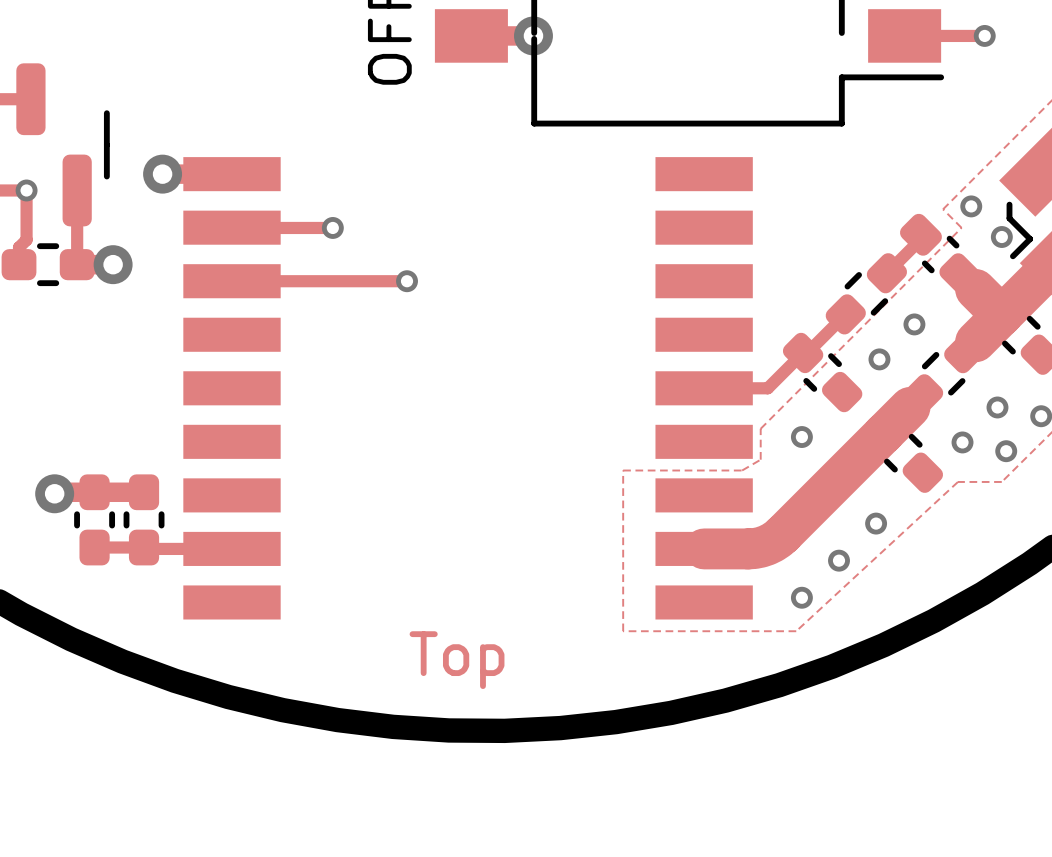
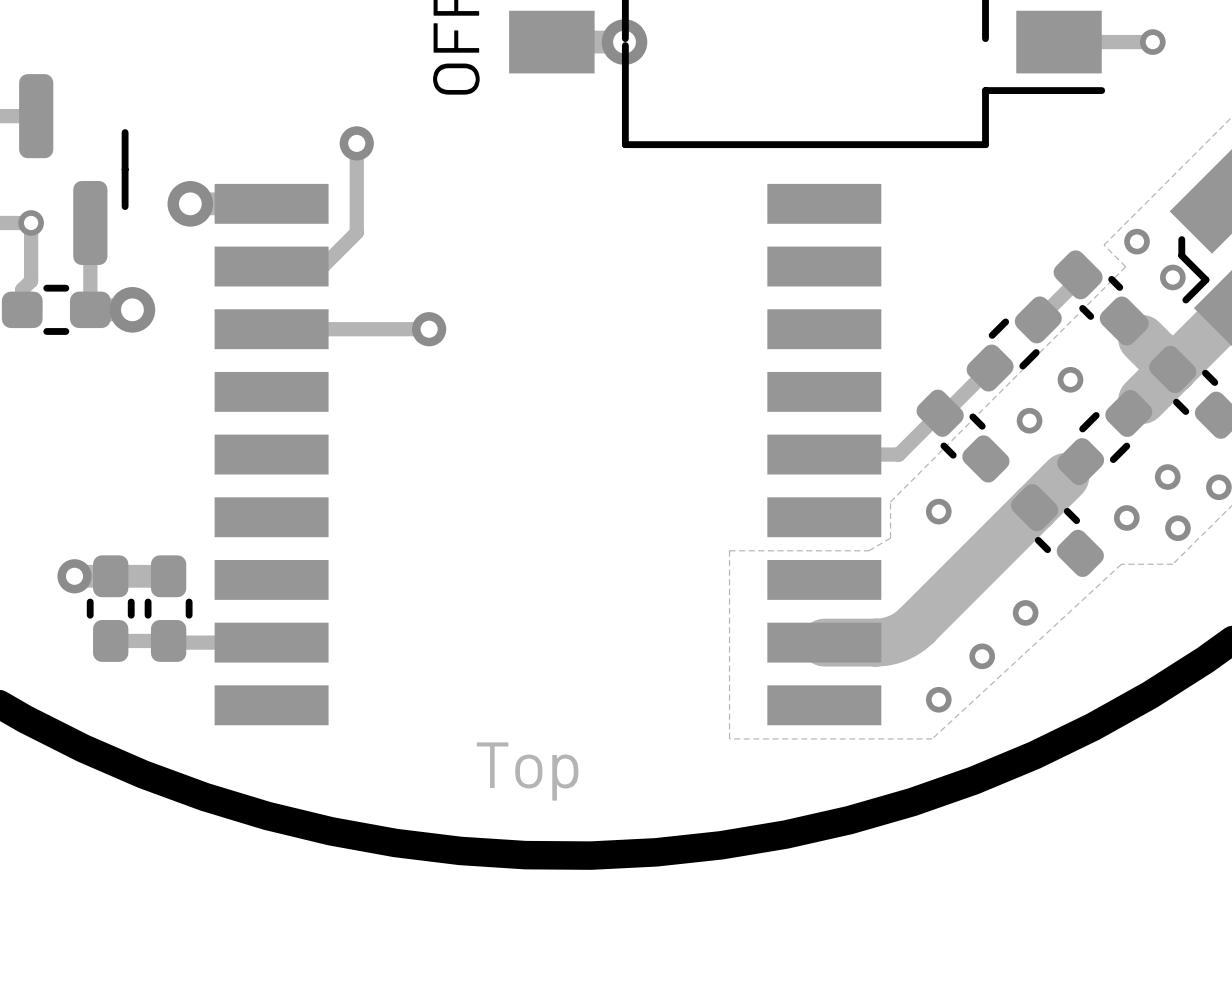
via: none -> (356, 143)
track: (276, 227) (332, 227) -> (322, 266) (356, 232) (356, 143)
via: (332, 227) -> none
track: (366, 281) (407, 281) -> none
via: none -> (429, 329)
via: (407, 281) -> none
via size: [35, 474, 75, 514] -> [57, 559, 92, 594]

